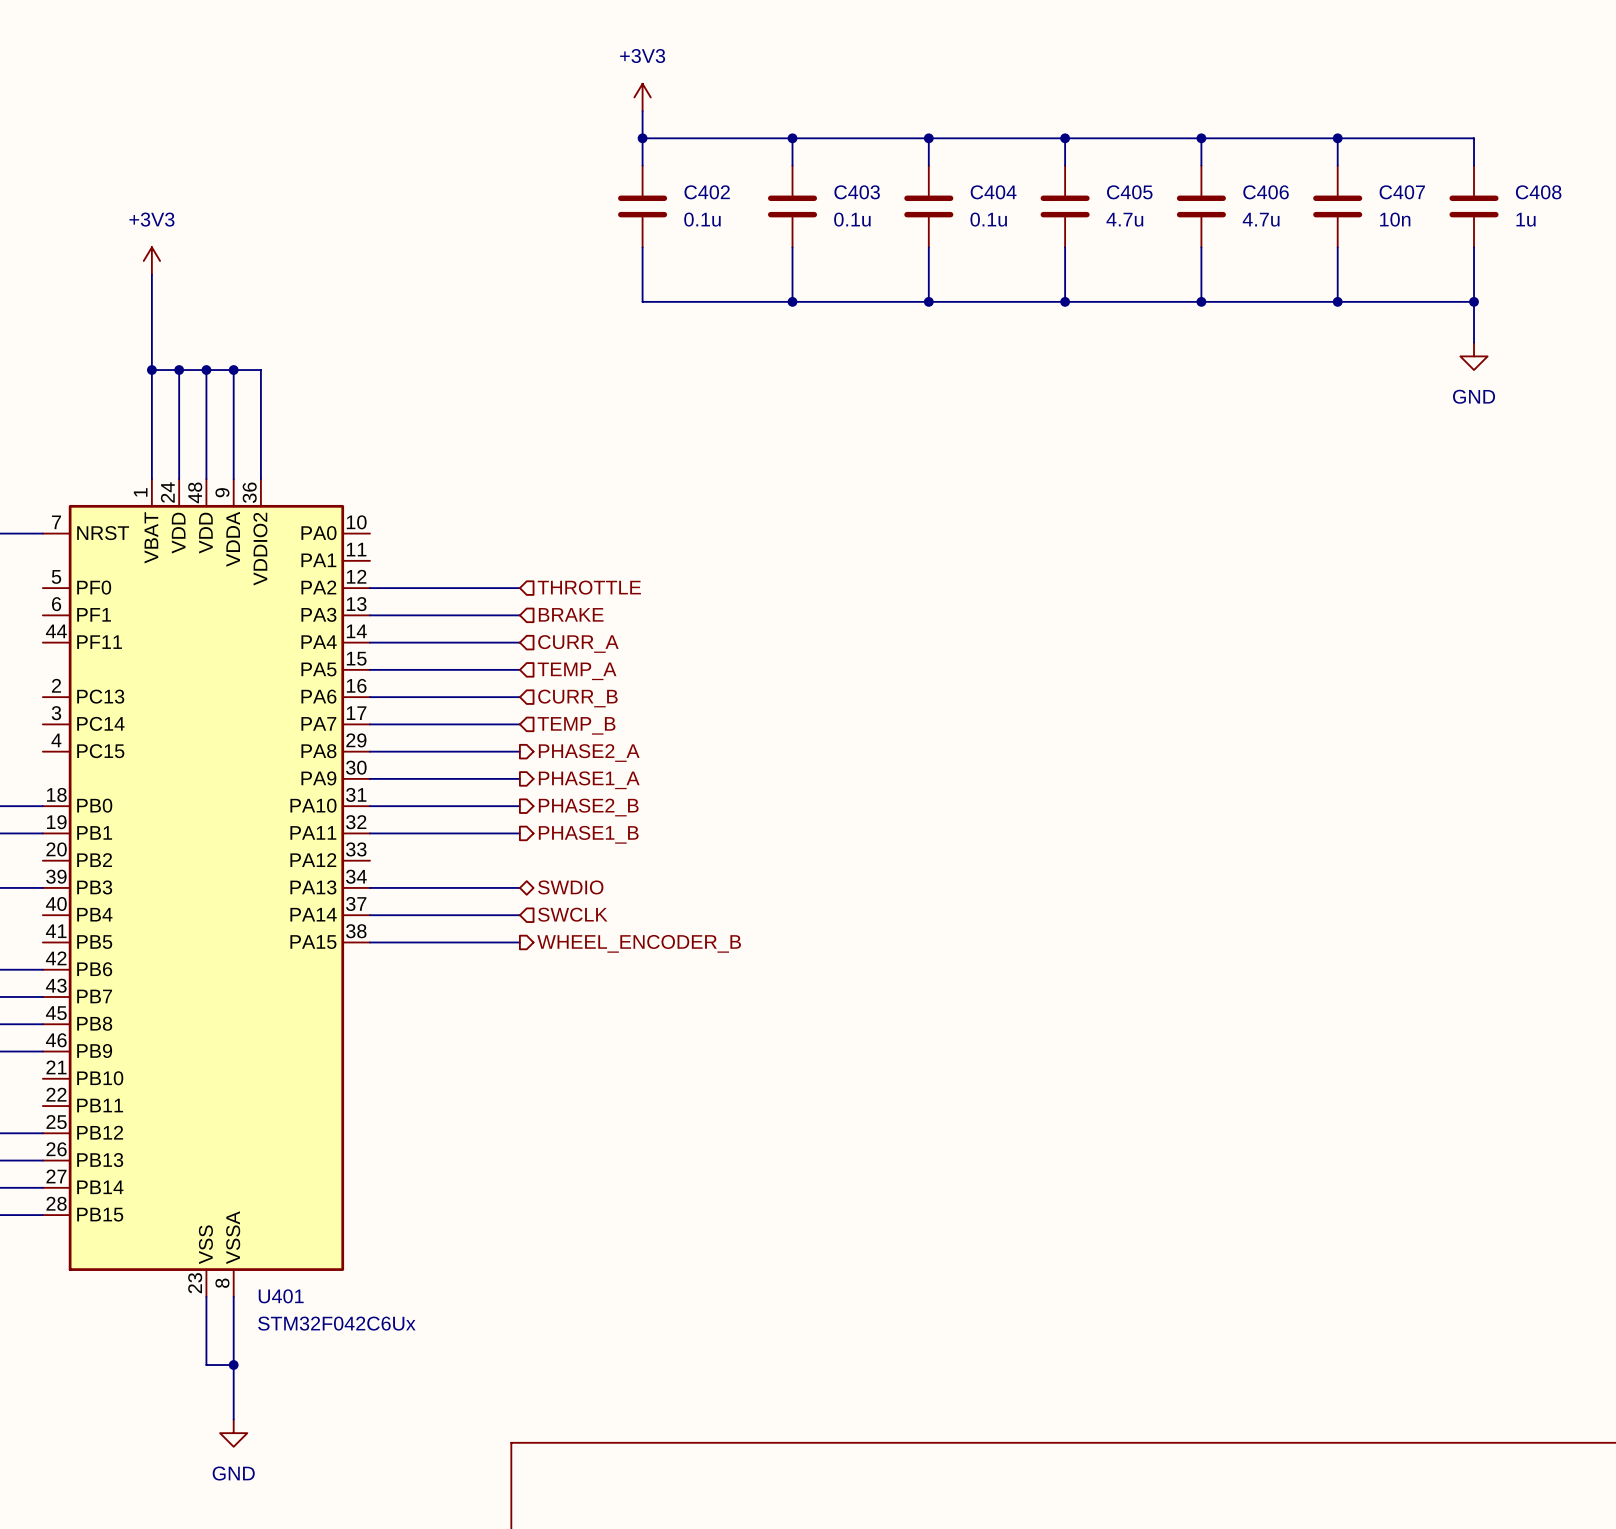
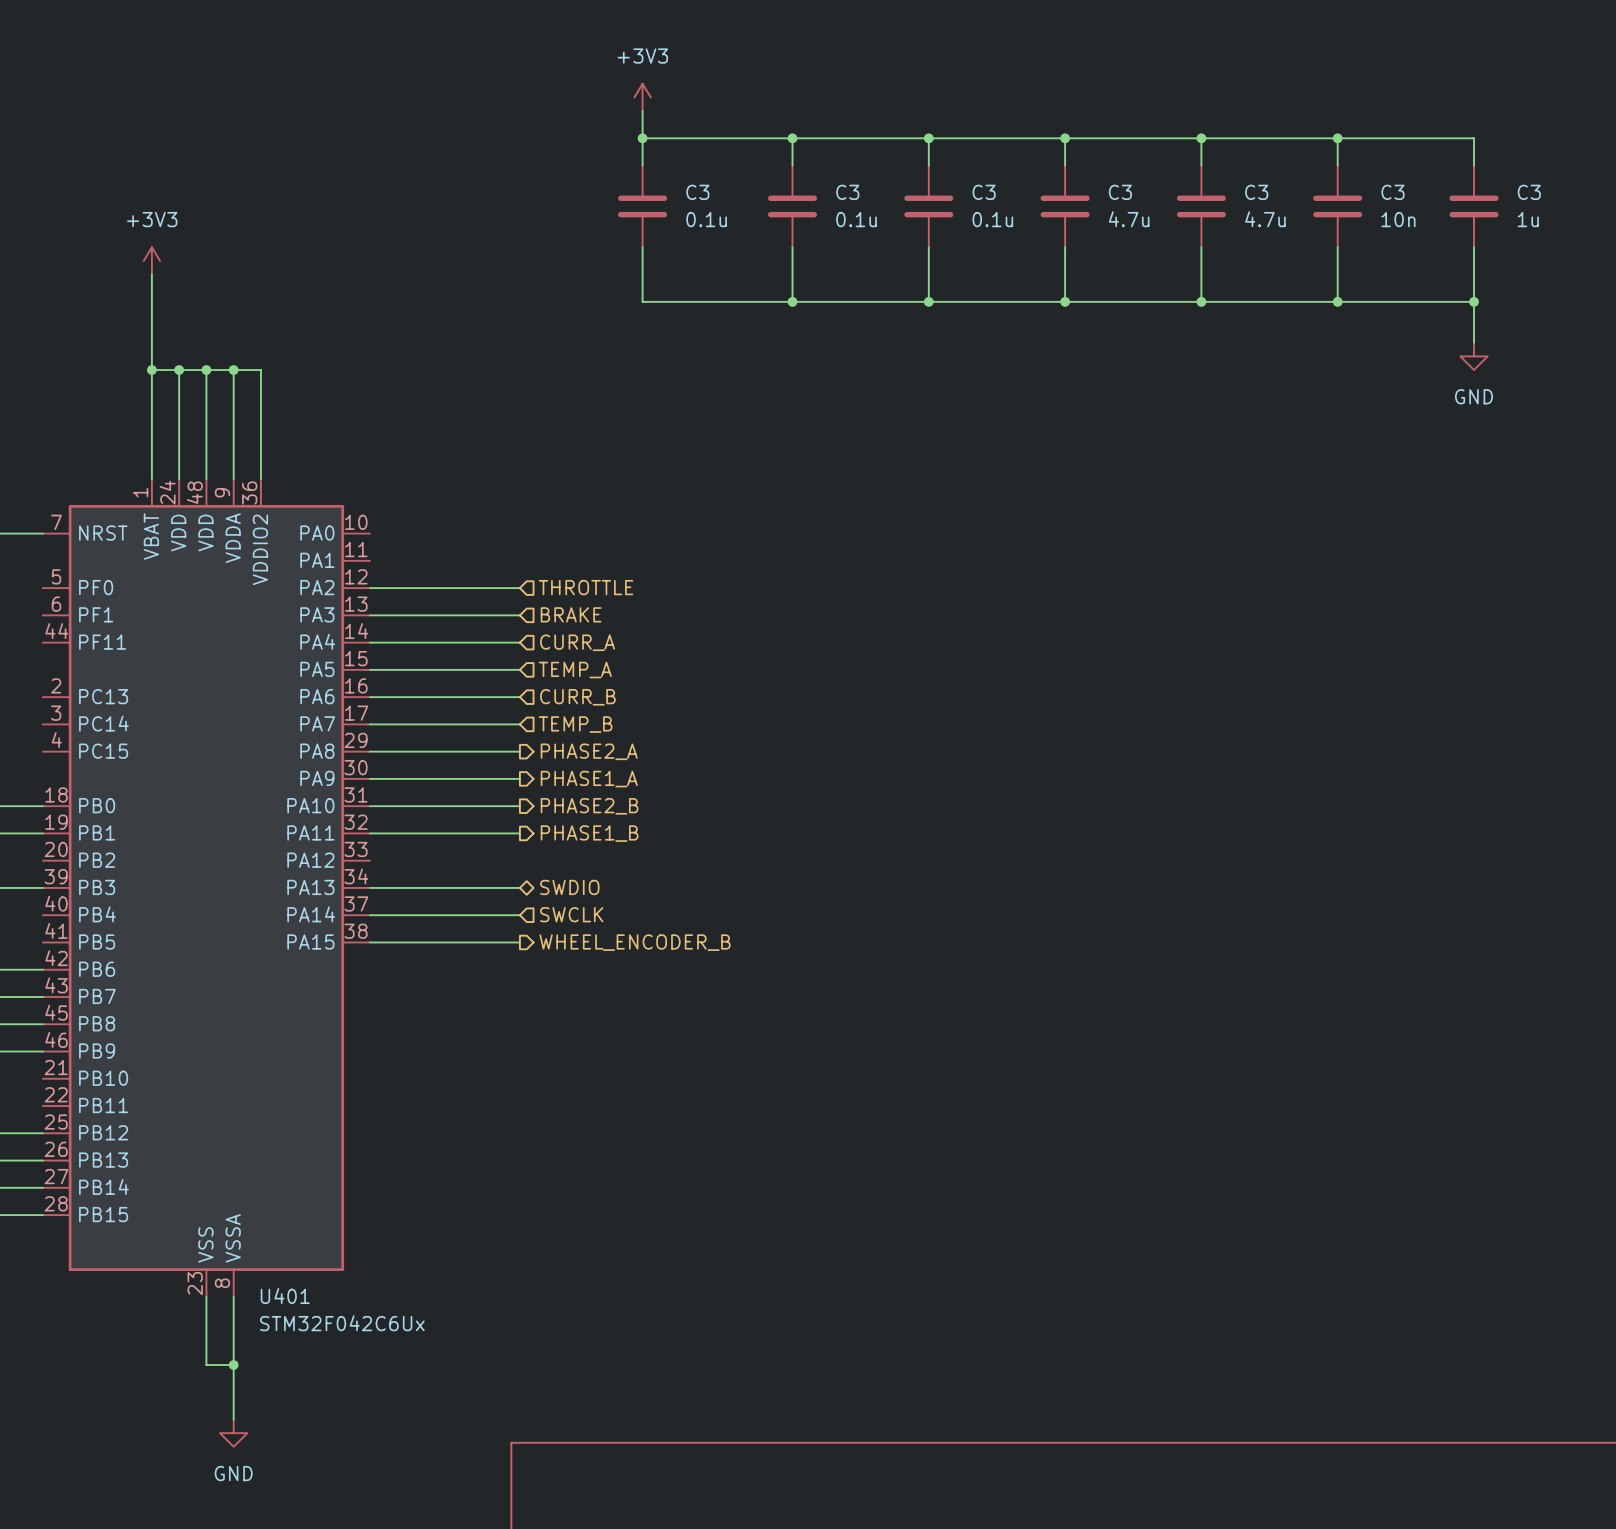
C402 name: C402 (707, 192) -> C3 (697, 192)
C403 name: C403 (857, 192) -> C3 (847, 192)
C404 name: C404 (993, 192) -> C3 (984, 192)
C405 name: C405 (1129, 192) -> C3 (1120, 192)
C406 name: C406 (1266, 192) -> C3 (1256, 192)
C407 name: C407 (1402, 192) -> C3 (1392, 192)
C408 name: C408 (1538, 192) -> C3 (1529, 192)

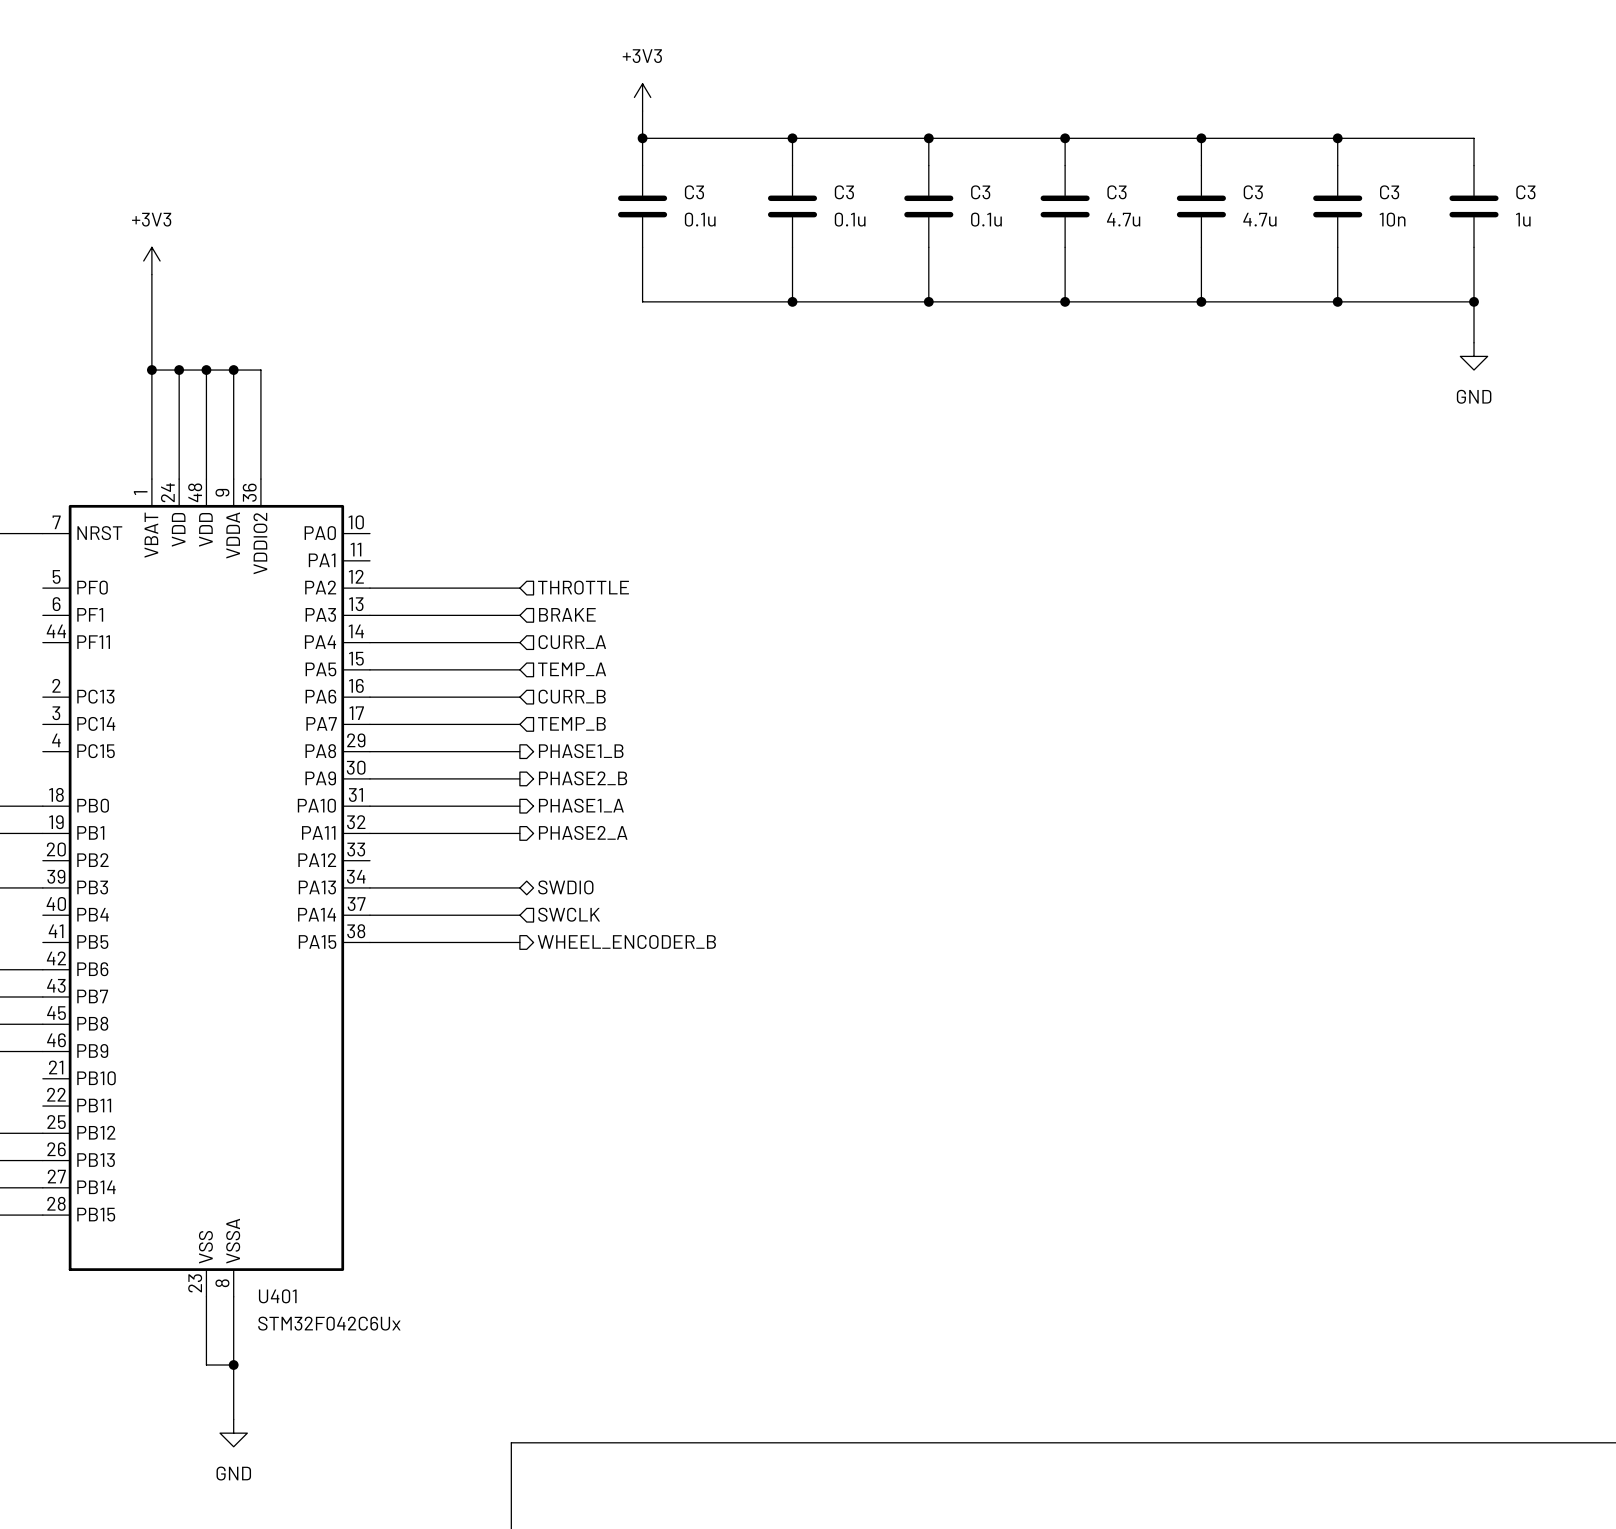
hierarchical label: PHASE2_A (589, 751) -> PHASE1_B (581, 751)
hierarchical label: PHASE1_A (589, 779) -> PHASE2_B (583, 778)
hierarchical label: PHASE2_B (589, 806) -> PHASE1_A (581, 805)
hierarchical label: PHASE1_B (589, 833) -> PHASE2_A (583, 832)

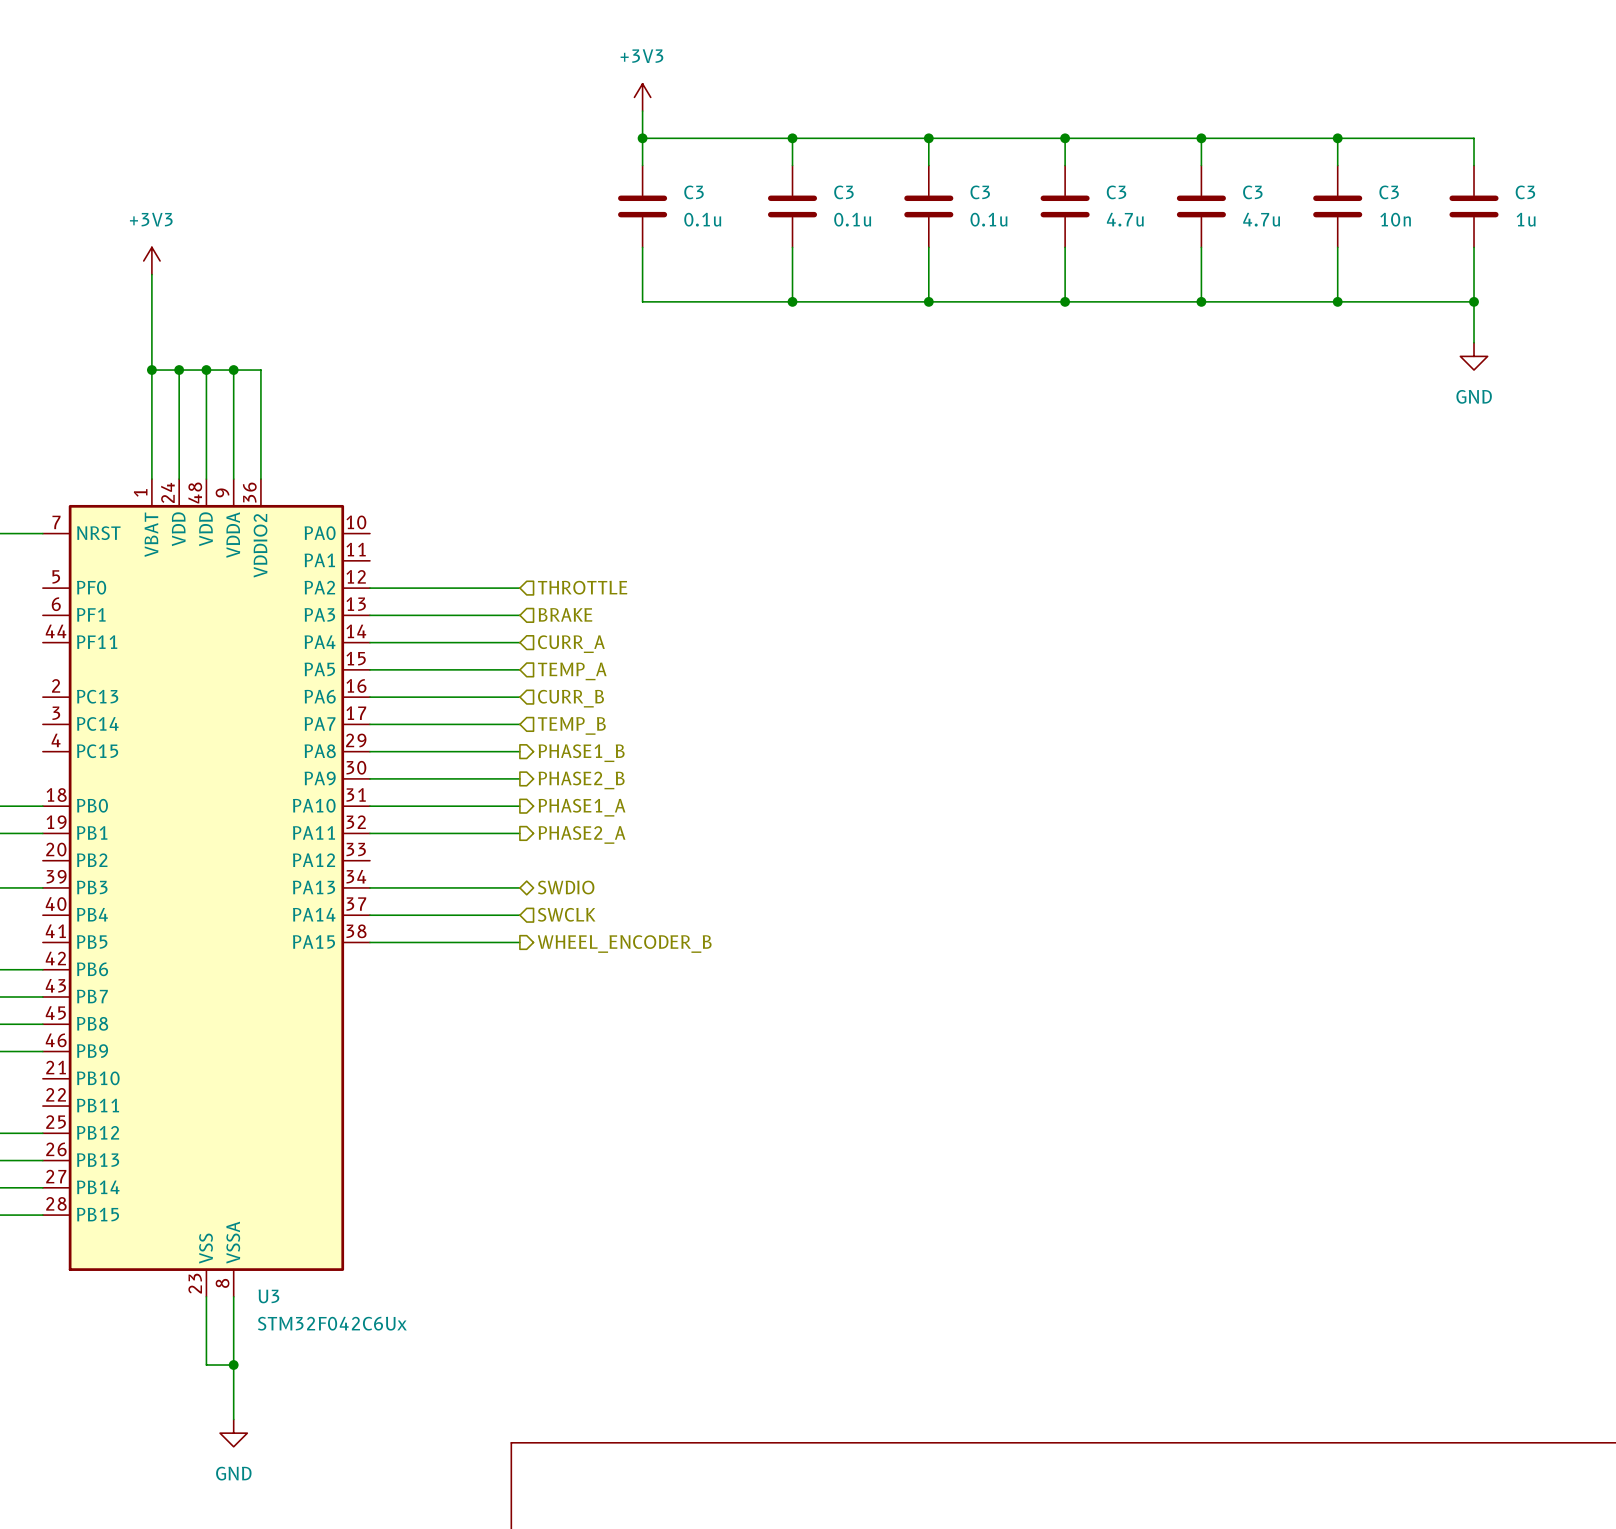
U401 name: U401 (277, 1296) -> U3 (268, 1296)

